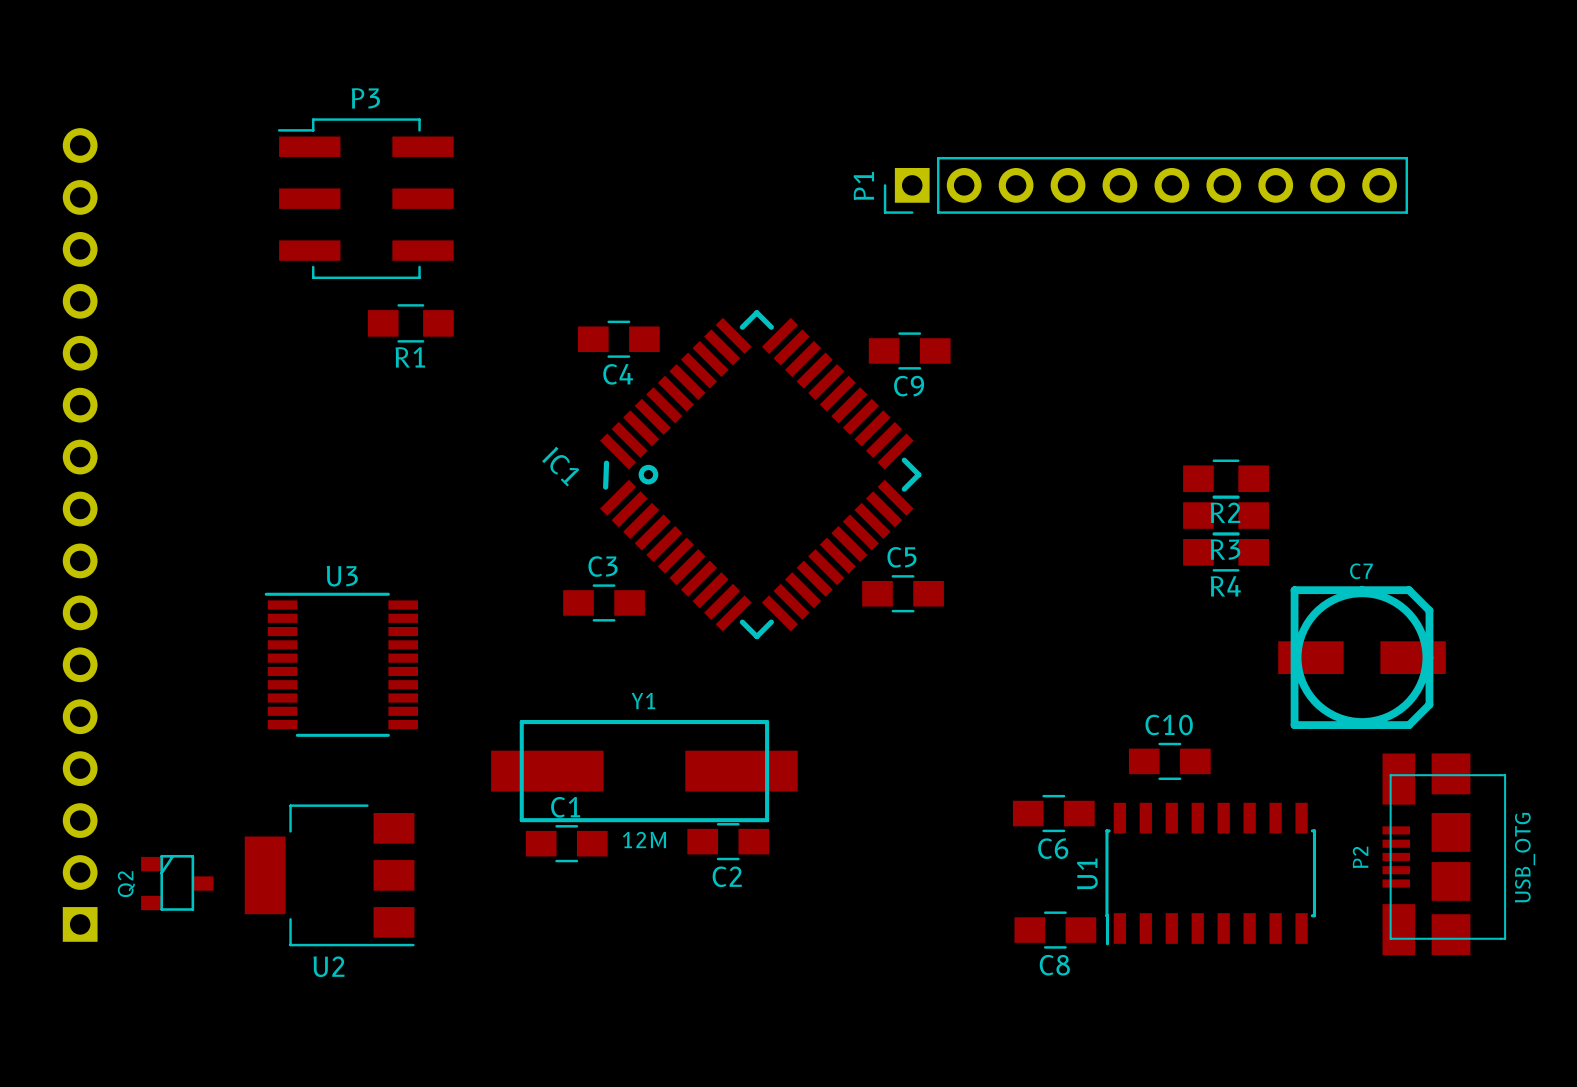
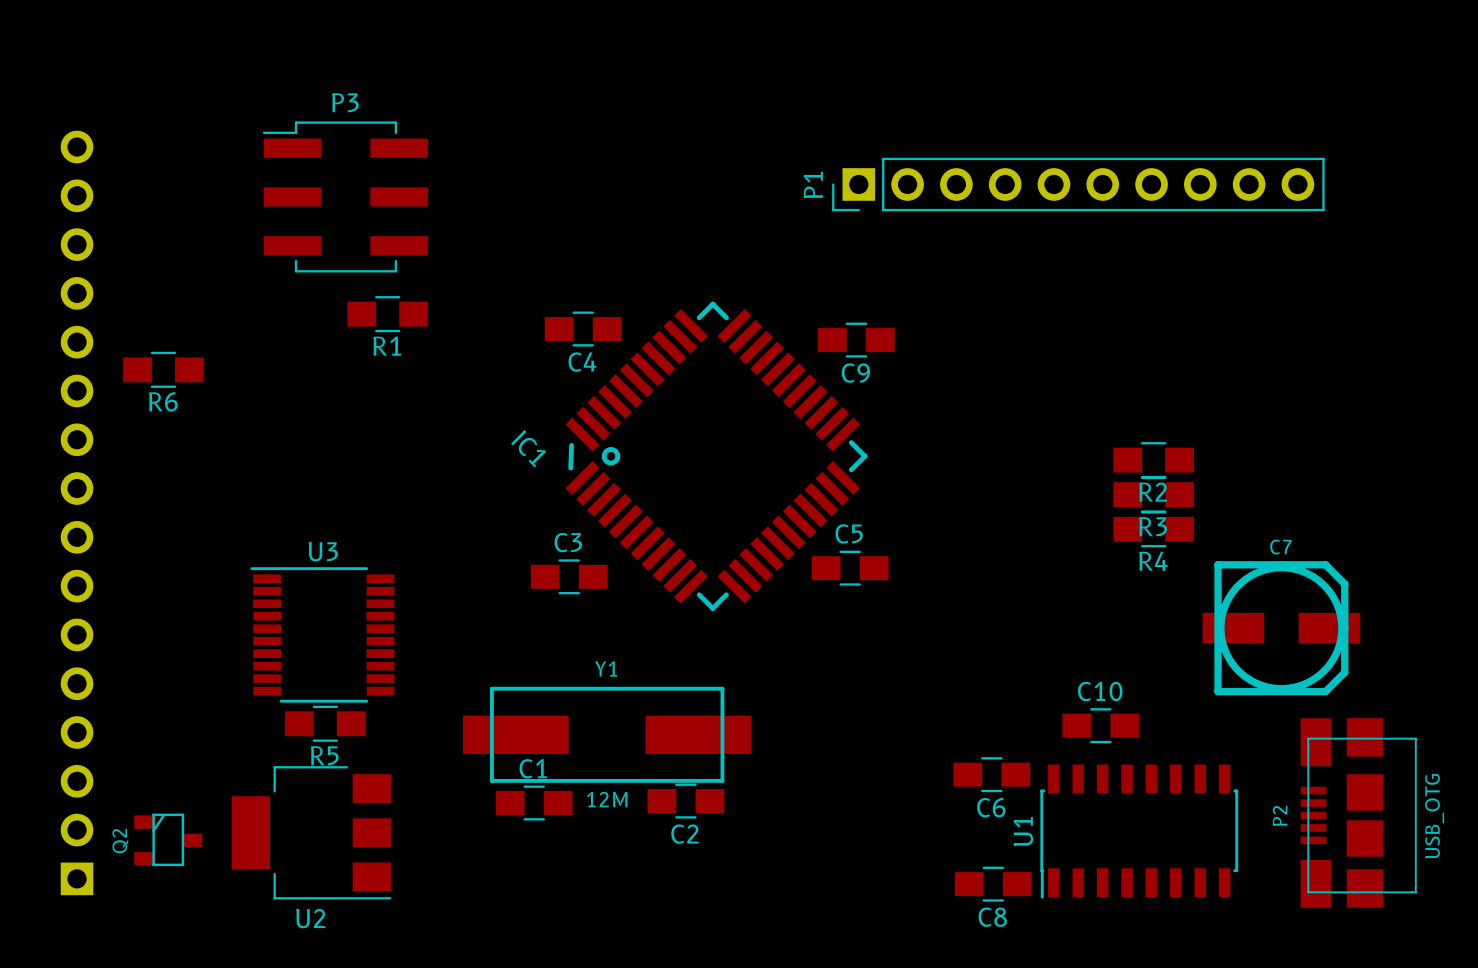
R6: none -> (163, 369)
R5: none -> (325, 723)

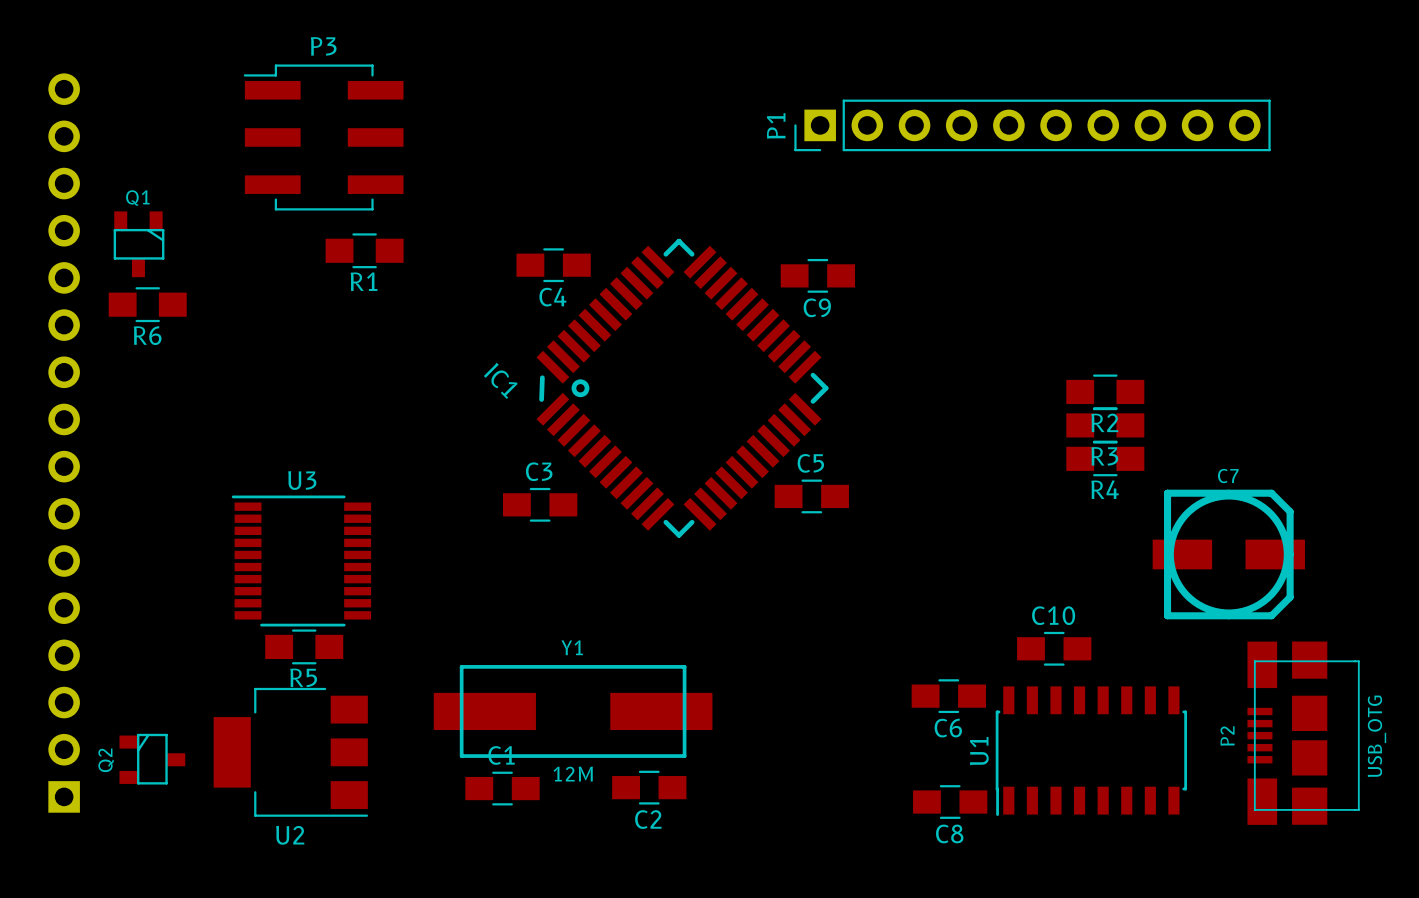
Q1: none -> (139, 244)
Y1 position: (607, 734) -> (573, 711)
C2 position: (685, 801) -> (649, 787)
C1 position: (534, 802) -> (502, 788)

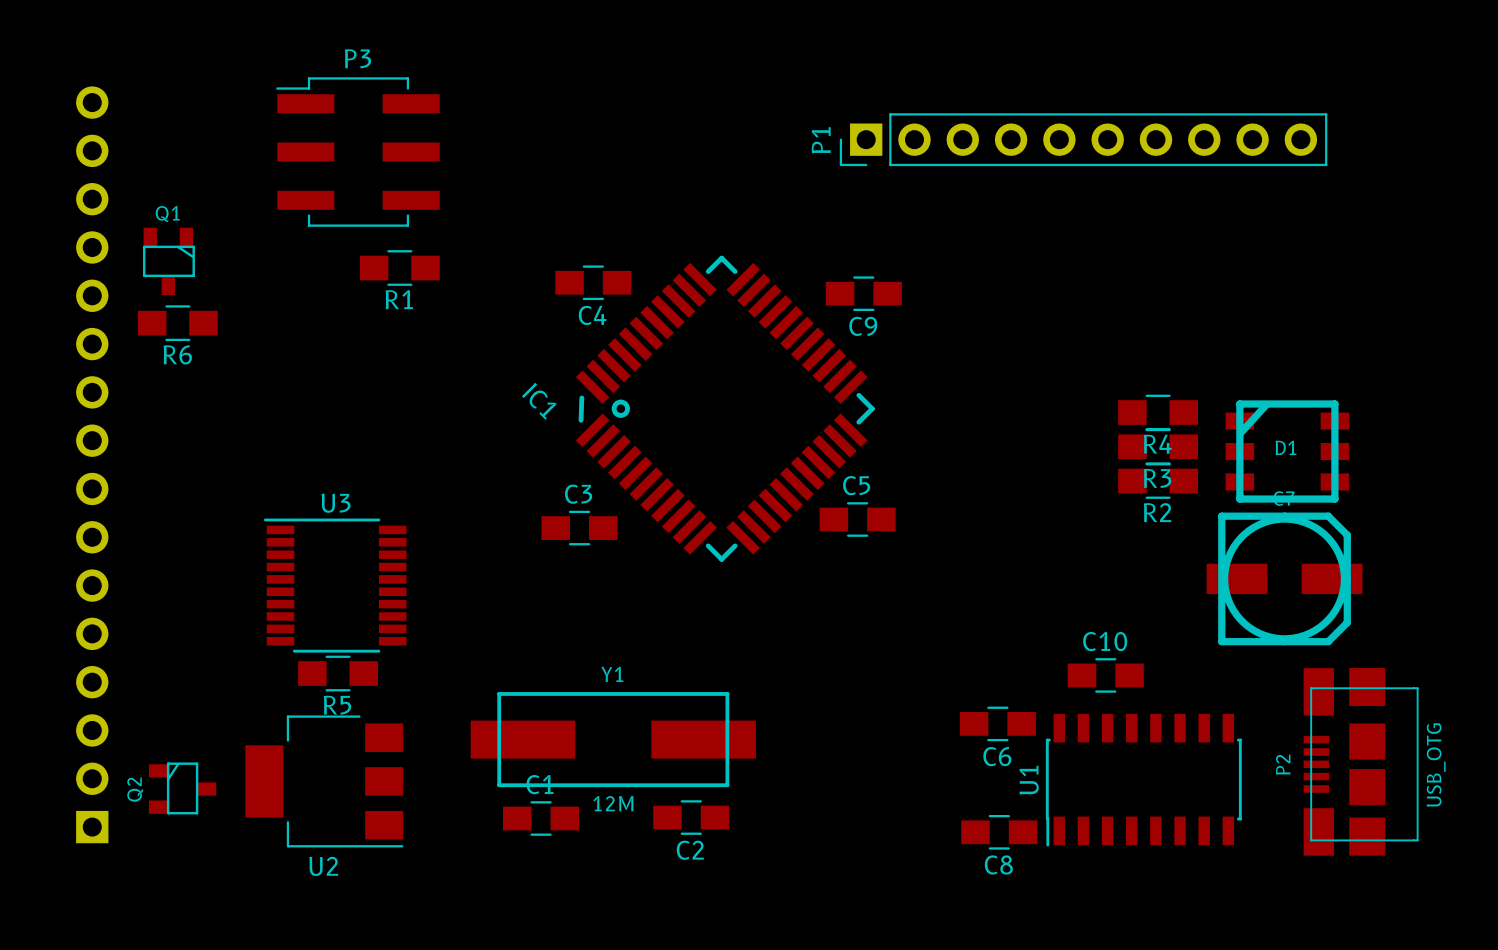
R2 name: R2 (1104, 422) -> R4 (1157, 444)
D1: none -> (1287, 451)
R4 name: R4 (1105, 489) -> R2 (1157, 512)

